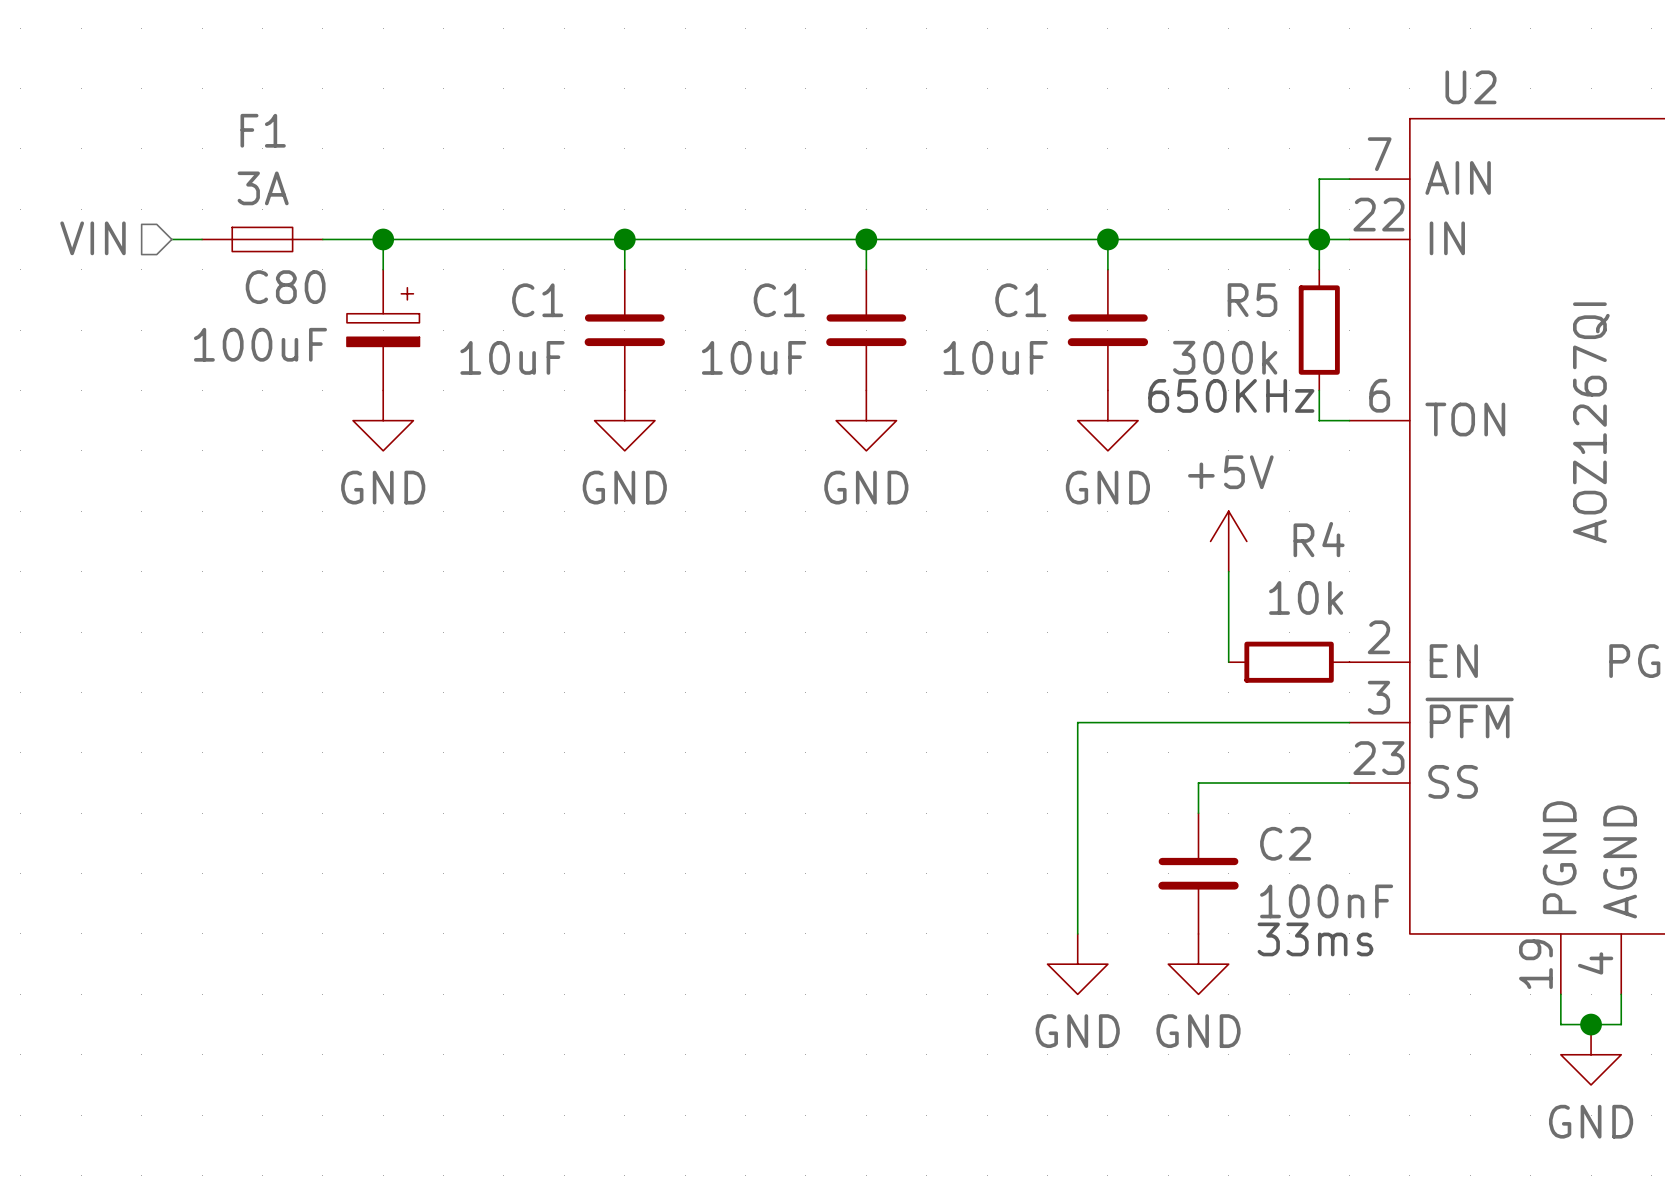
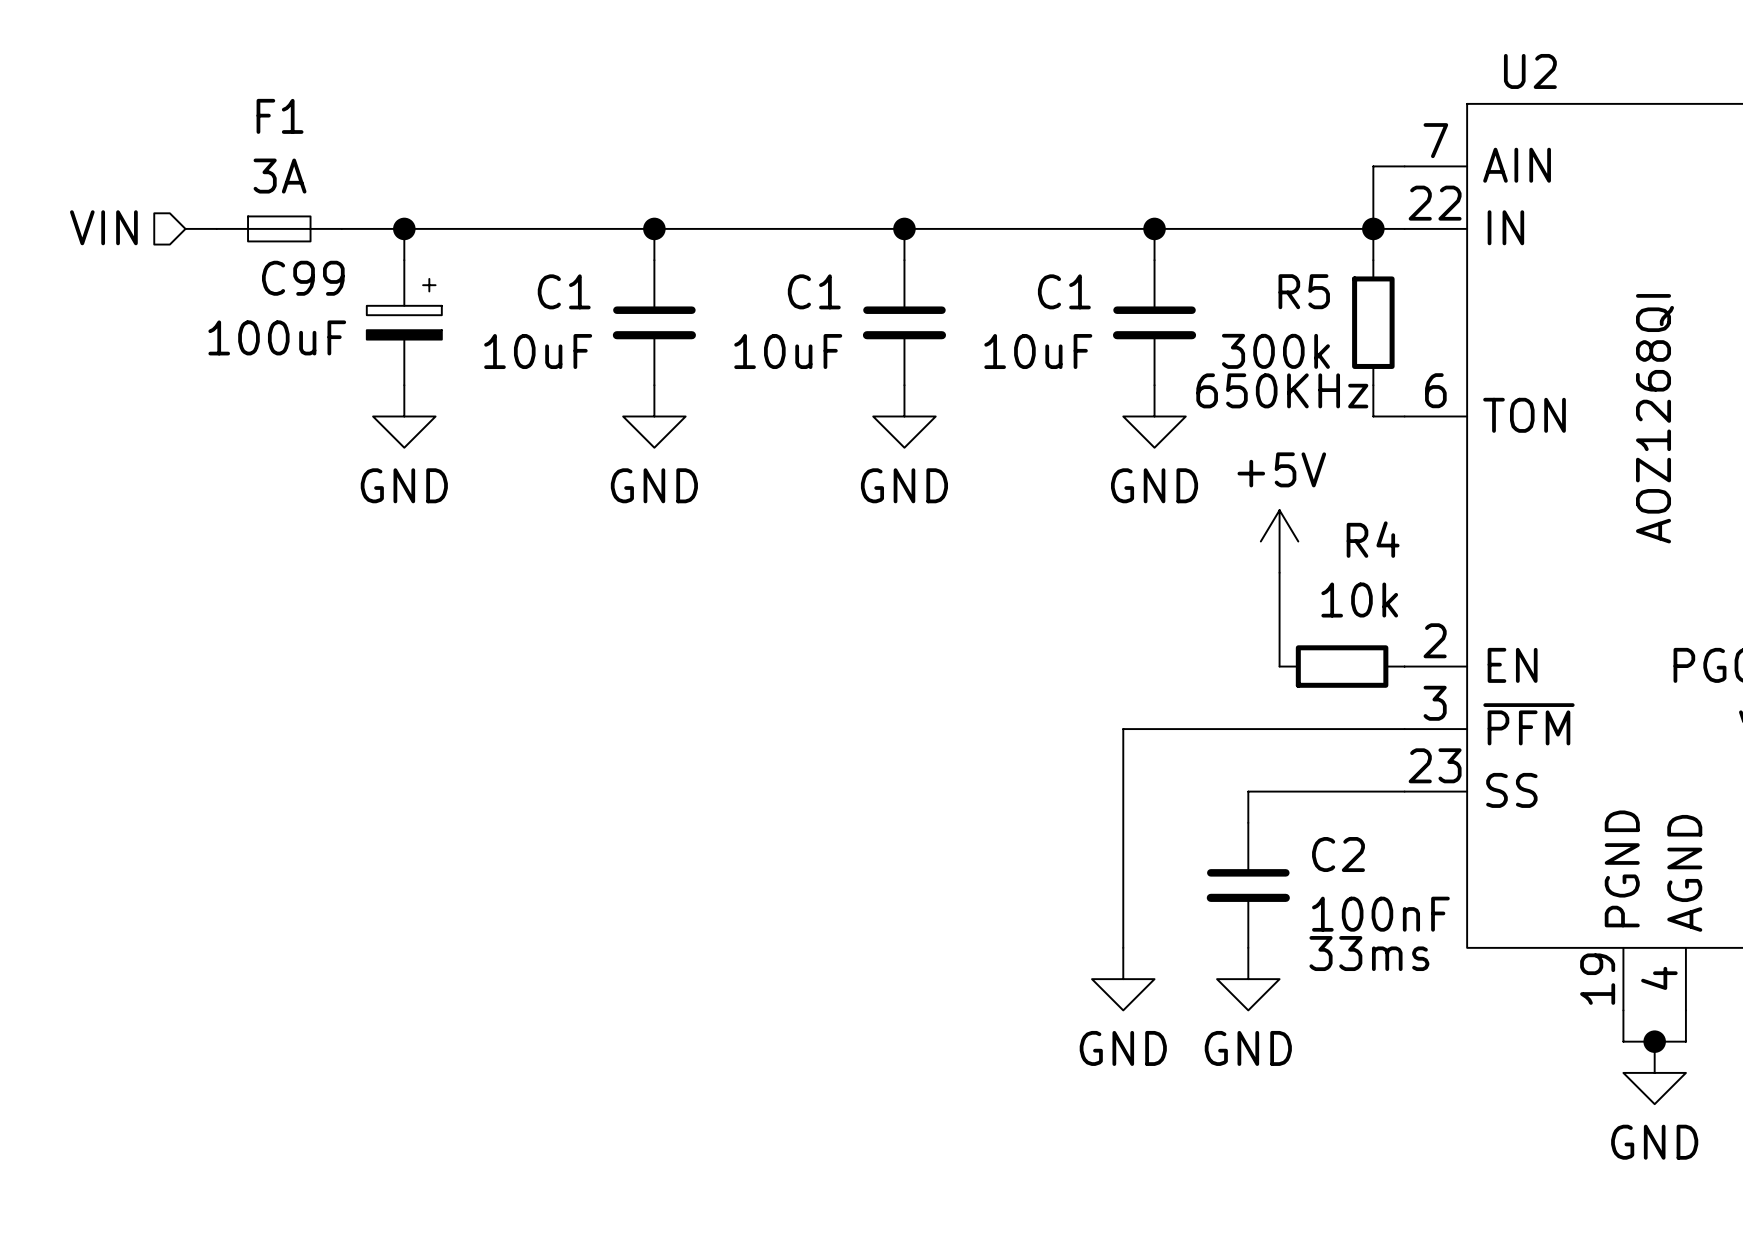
C80 name: C80 (285, 287) -> C99 (303, 278)
U2 value: AOZ1267QI (1591, 422) -> AOZ1268QI (1655, 418)

